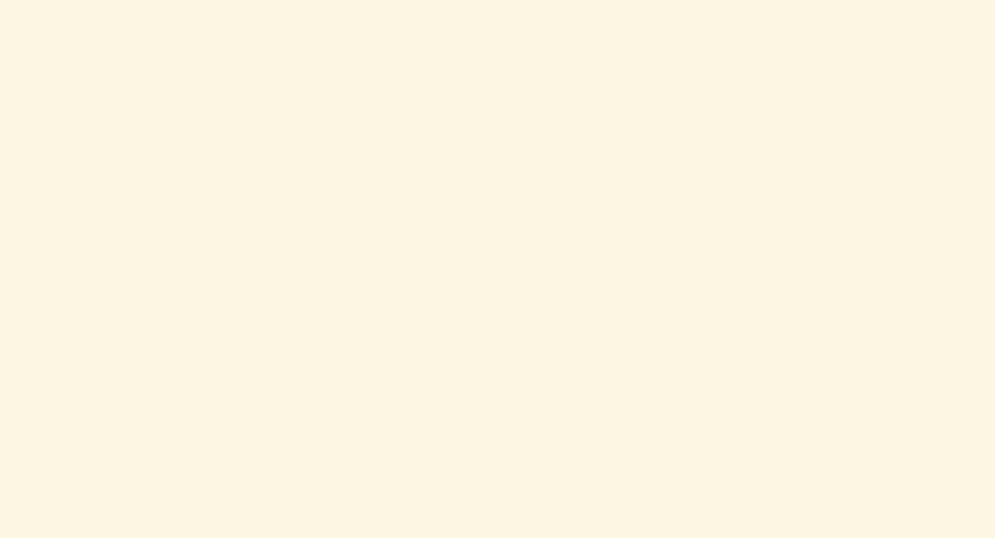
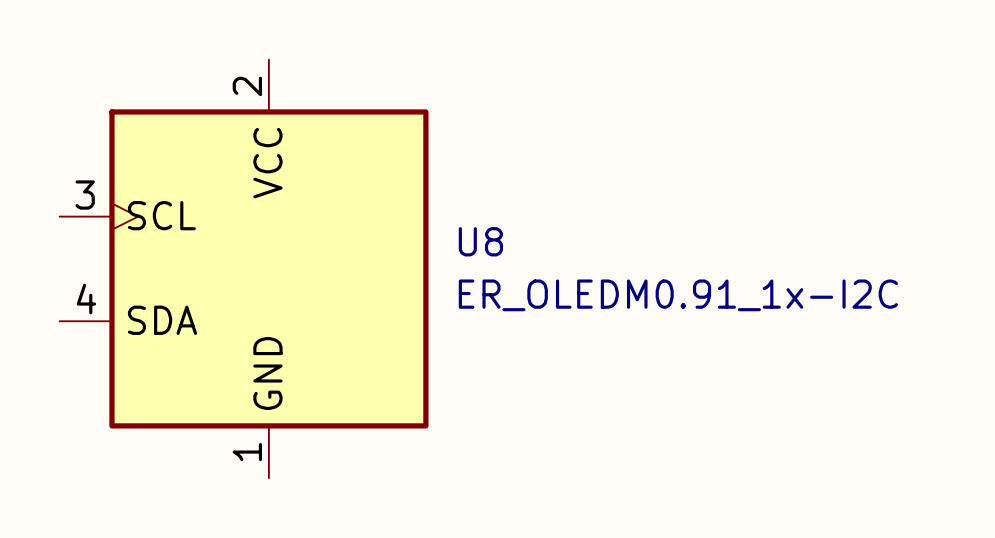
U8: none -> ER_OLEDM0.91_1x-I2C (244, 268)

